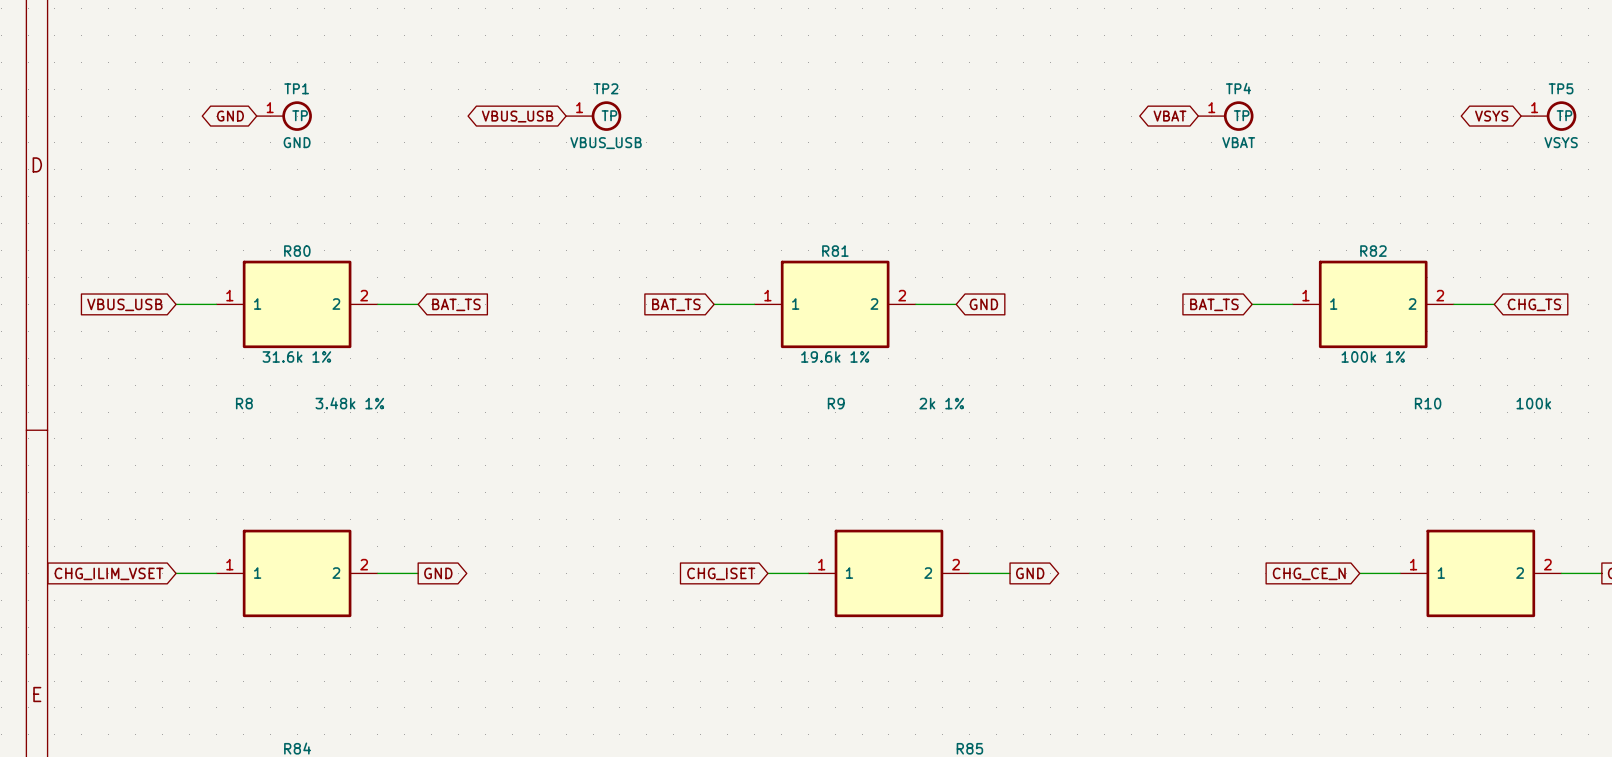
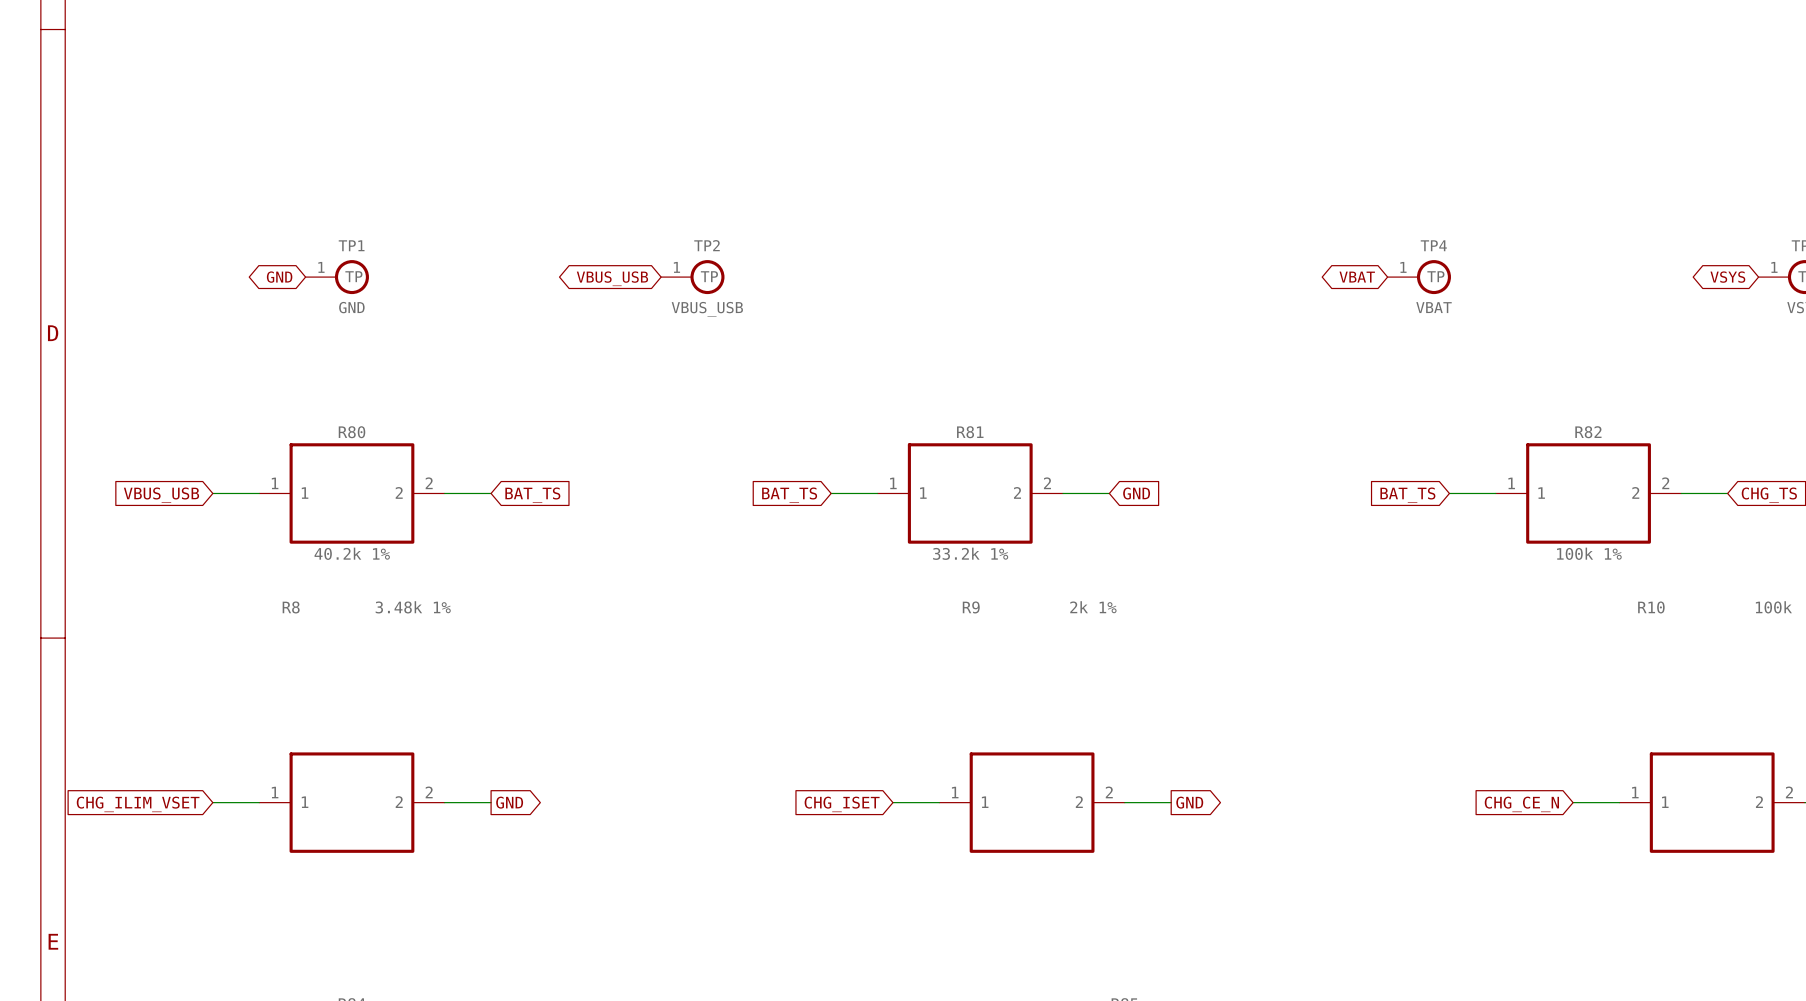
R80 value: 31.6k 1% (296, 356) -> 40.2k 1% (352, 553)
R81 value: 19.6k 1% (835, 356) -> 33.2k 1% (970, 553)

